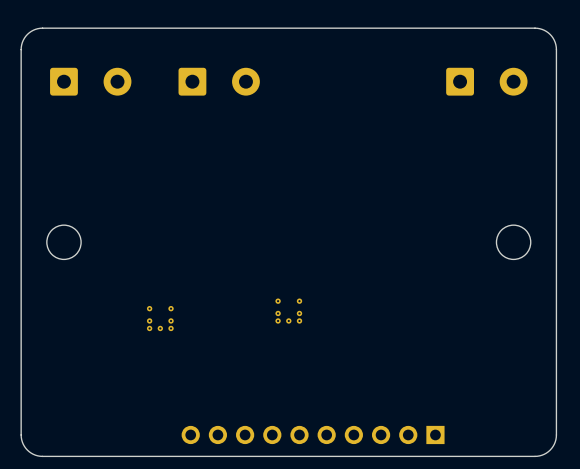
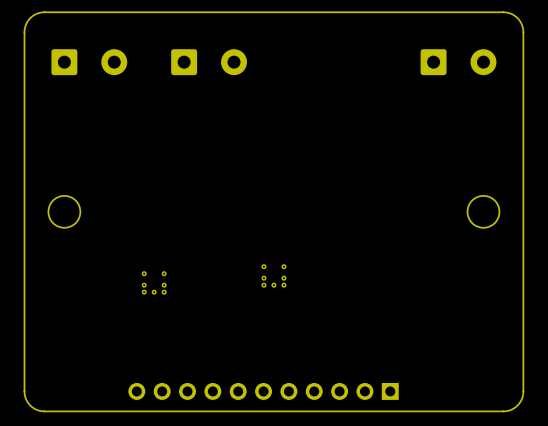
part: none -> (263, 391)
part: (313, 434) -> none

